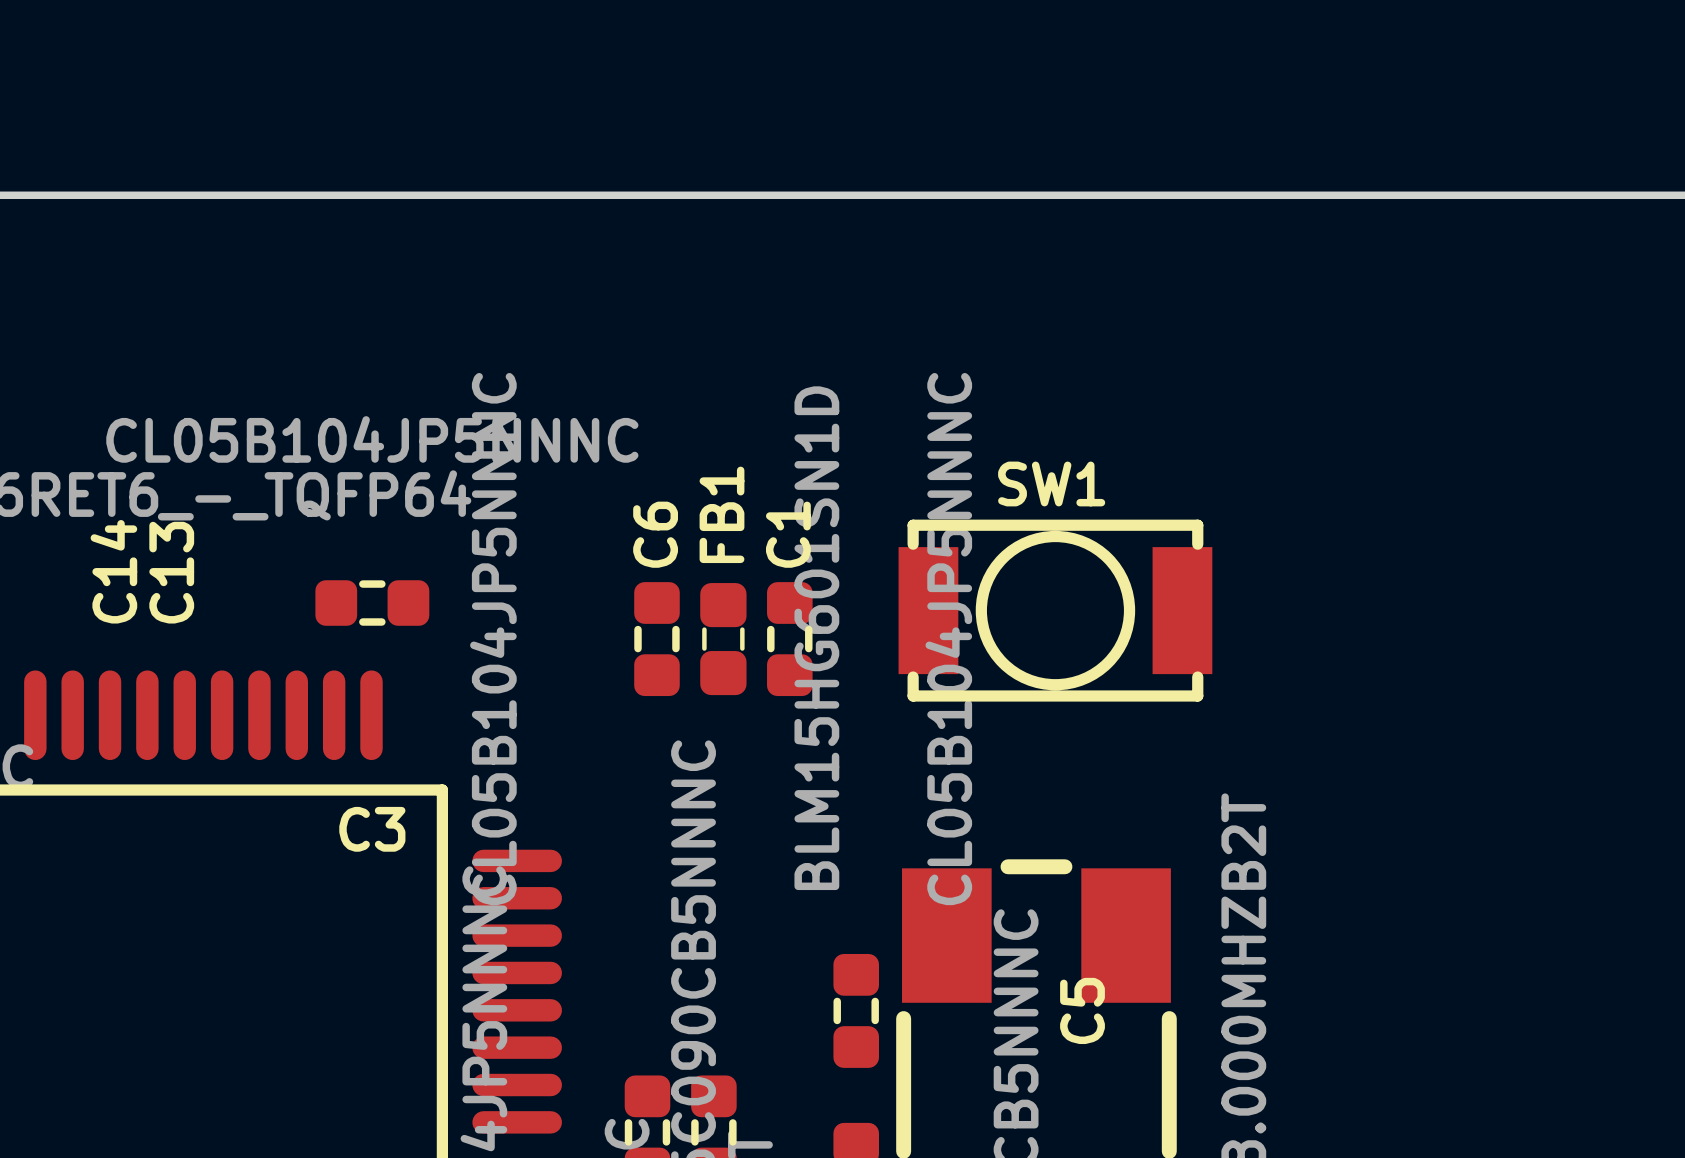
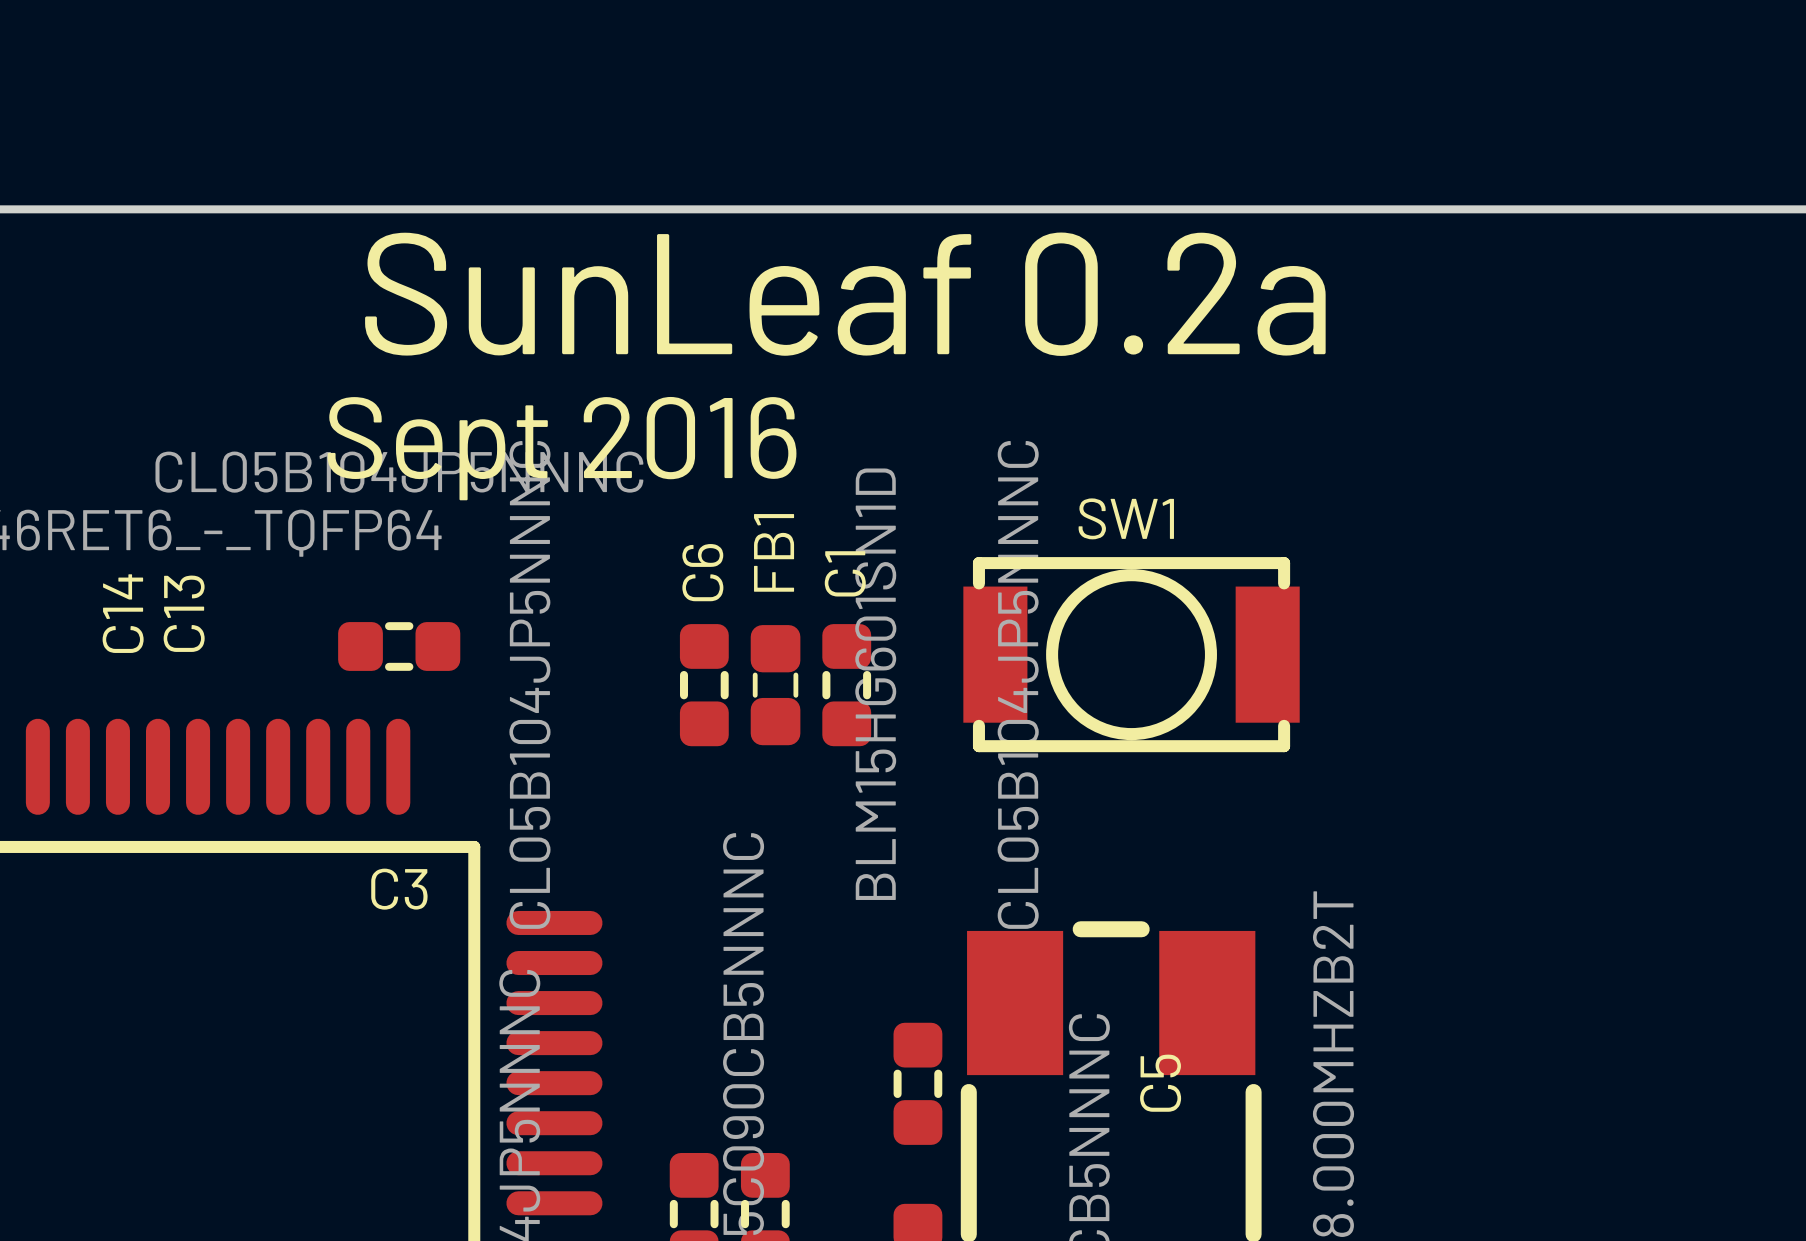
text: none -> SunLeaf 0.2a (845, 294)
text: none -> Sept 2016 (562, 448)

